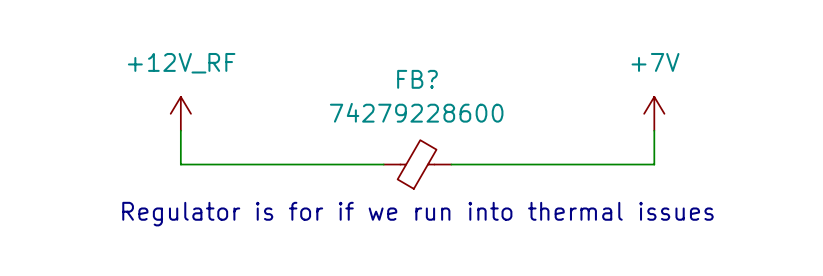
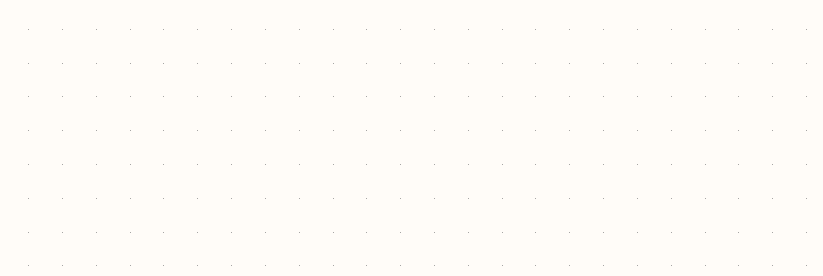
power symbol: +12V_RF (180, 113) -> none
power symbol: +7V (654, 113) -> none
wire: (180, 130) (180, 164) (383, 164) -> none
wire: (654, 130) (654, 164) (451, 164) -> none
FB?: 74279228600 (417, 164) -> none
text: Regulator is for if we run into thermal issues (417, 214) -> none

